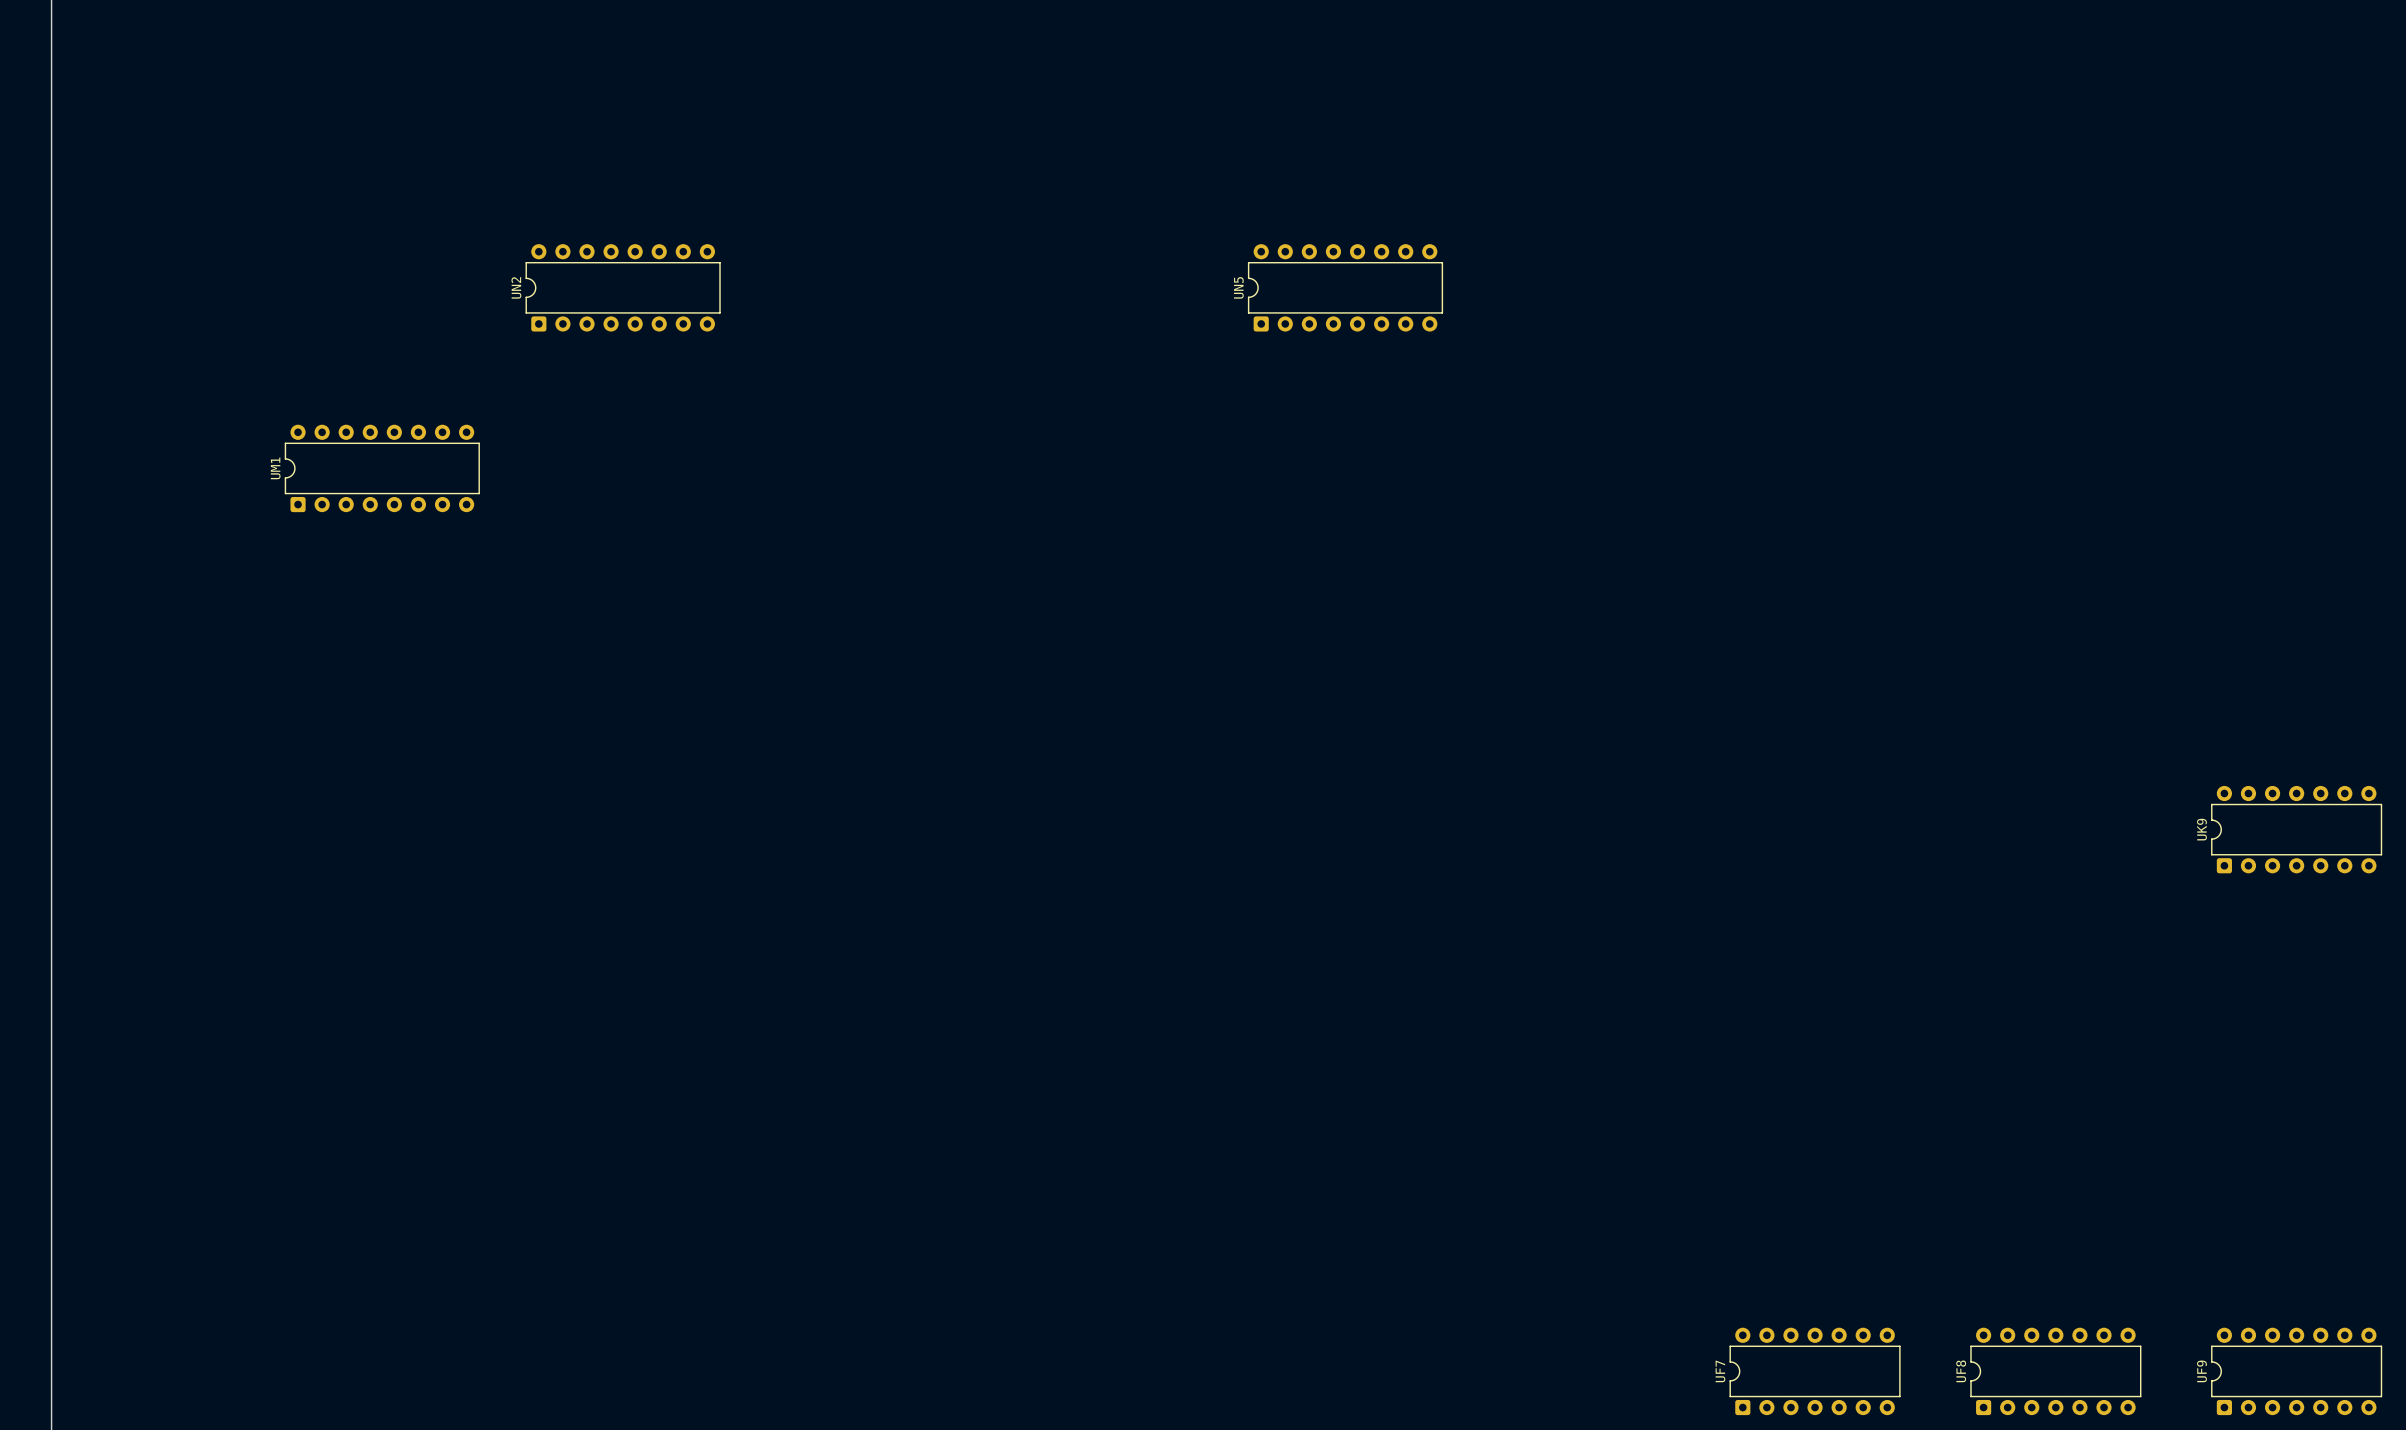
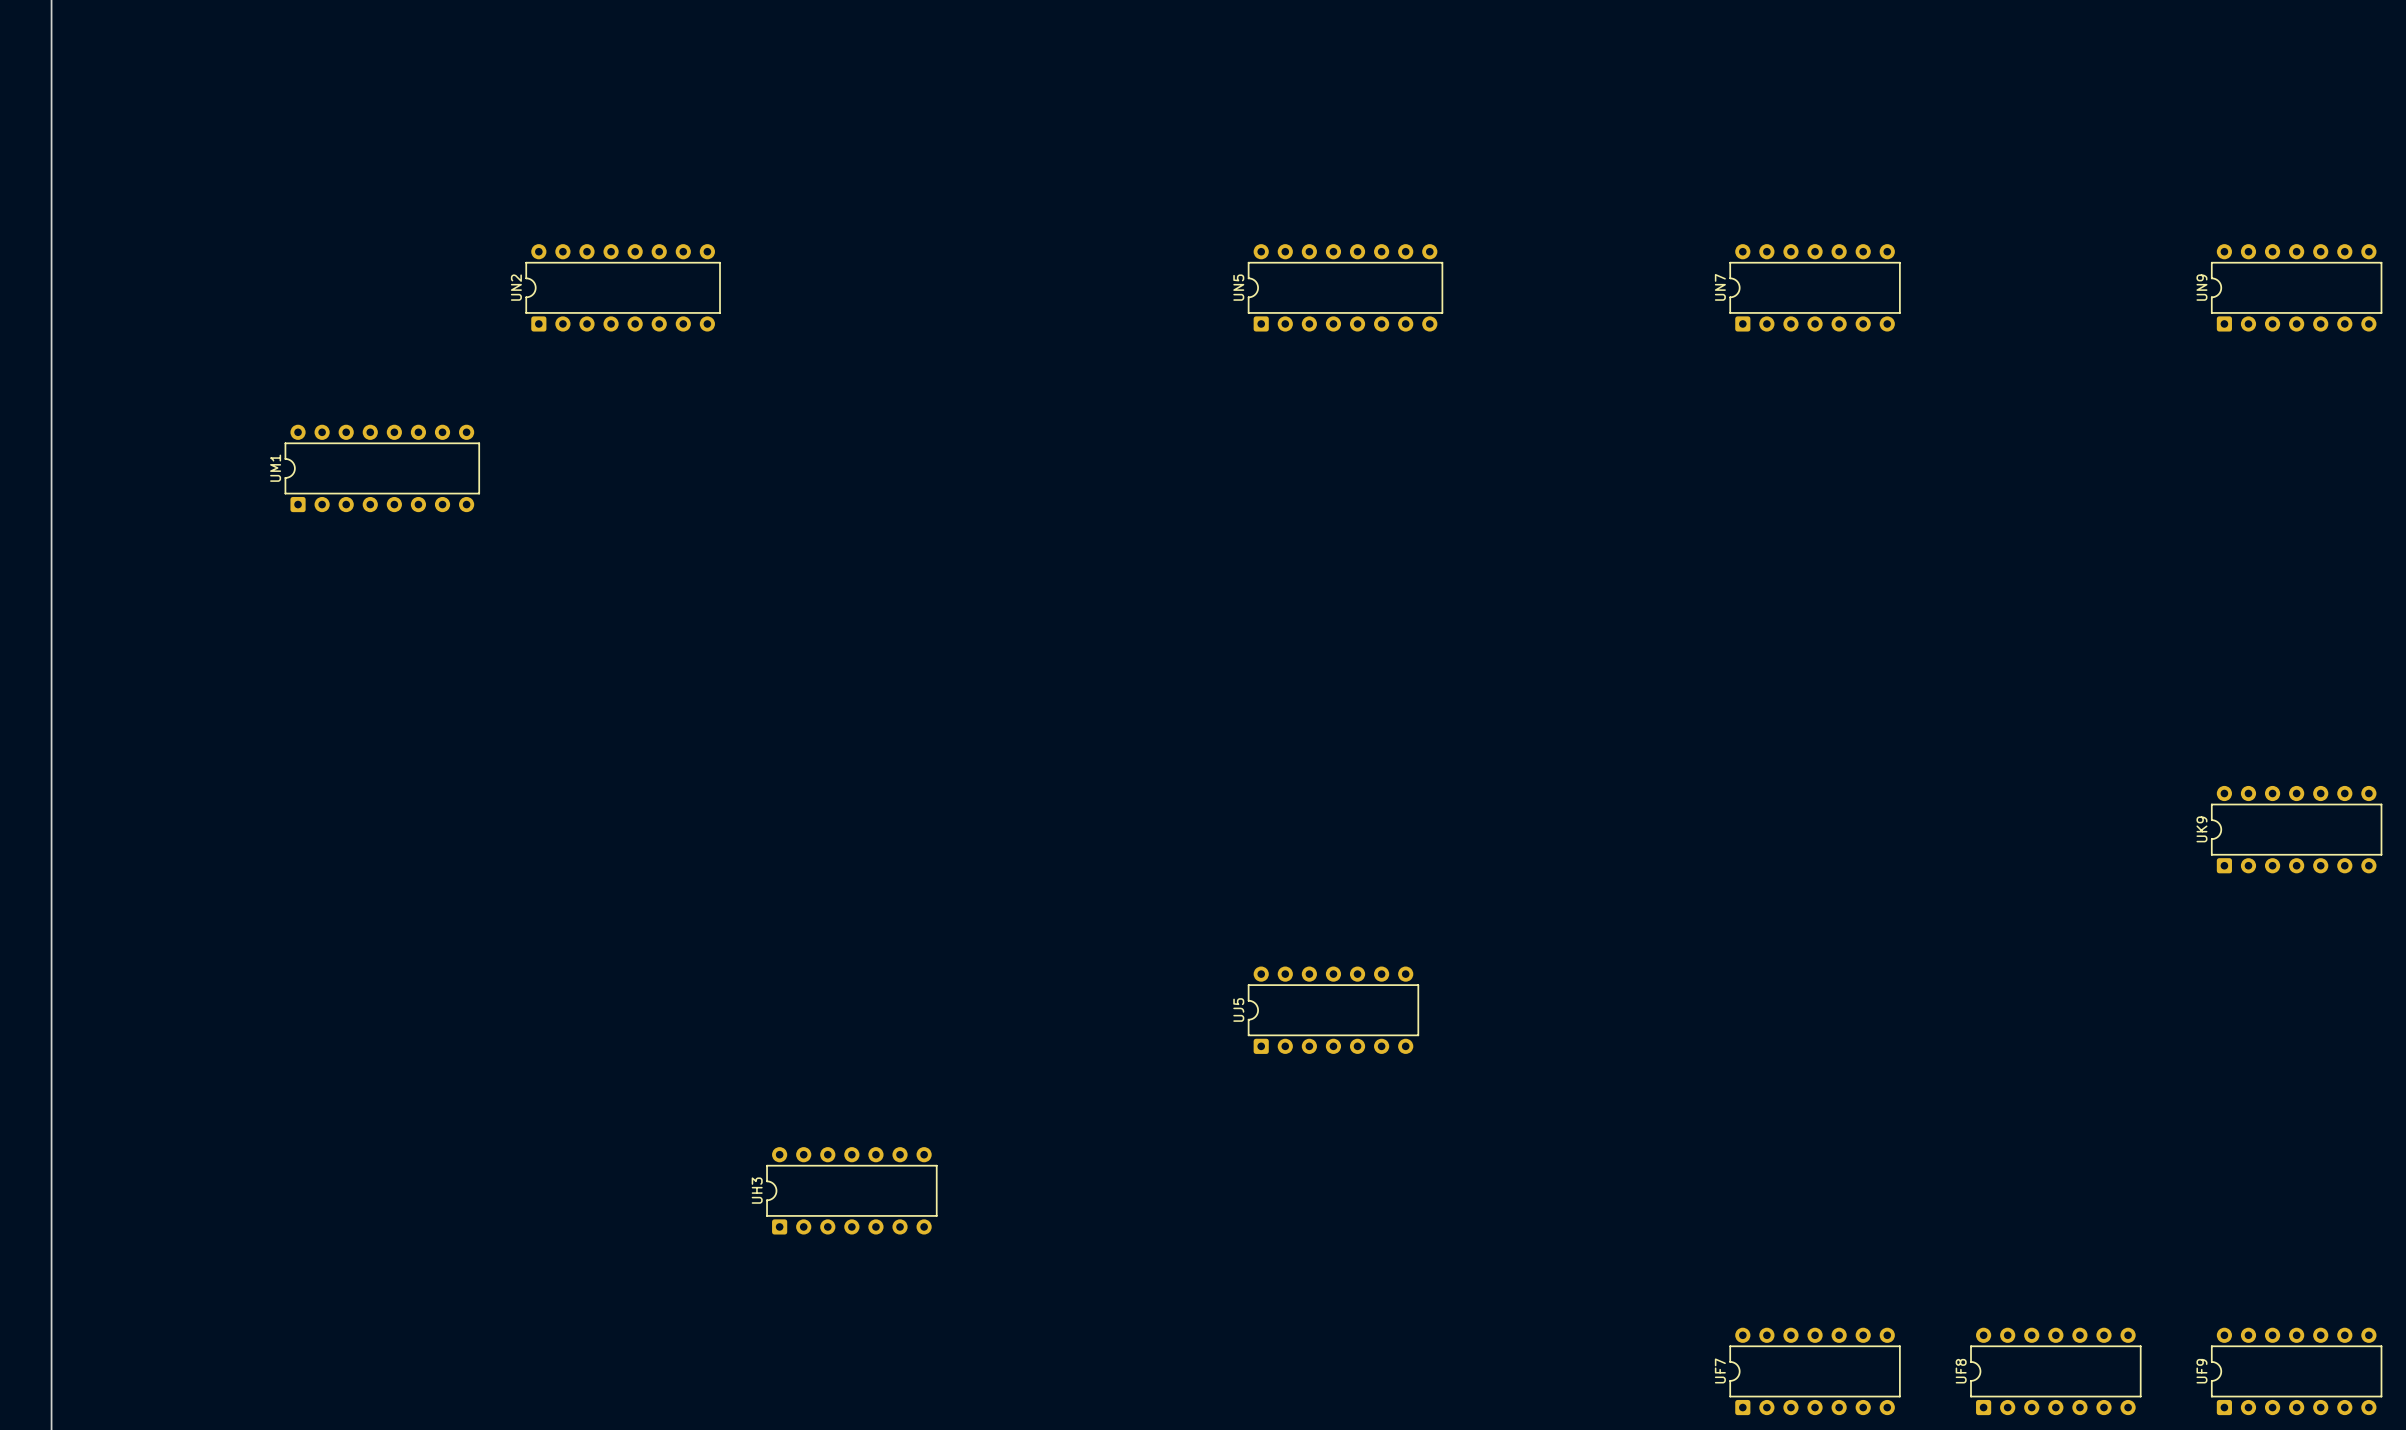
UN7: none -> (1815, 287)
UN9: none -> (2296, 287)
UJ5: none -> (1333, 1010)
UH3: none -> (851, 1190)

